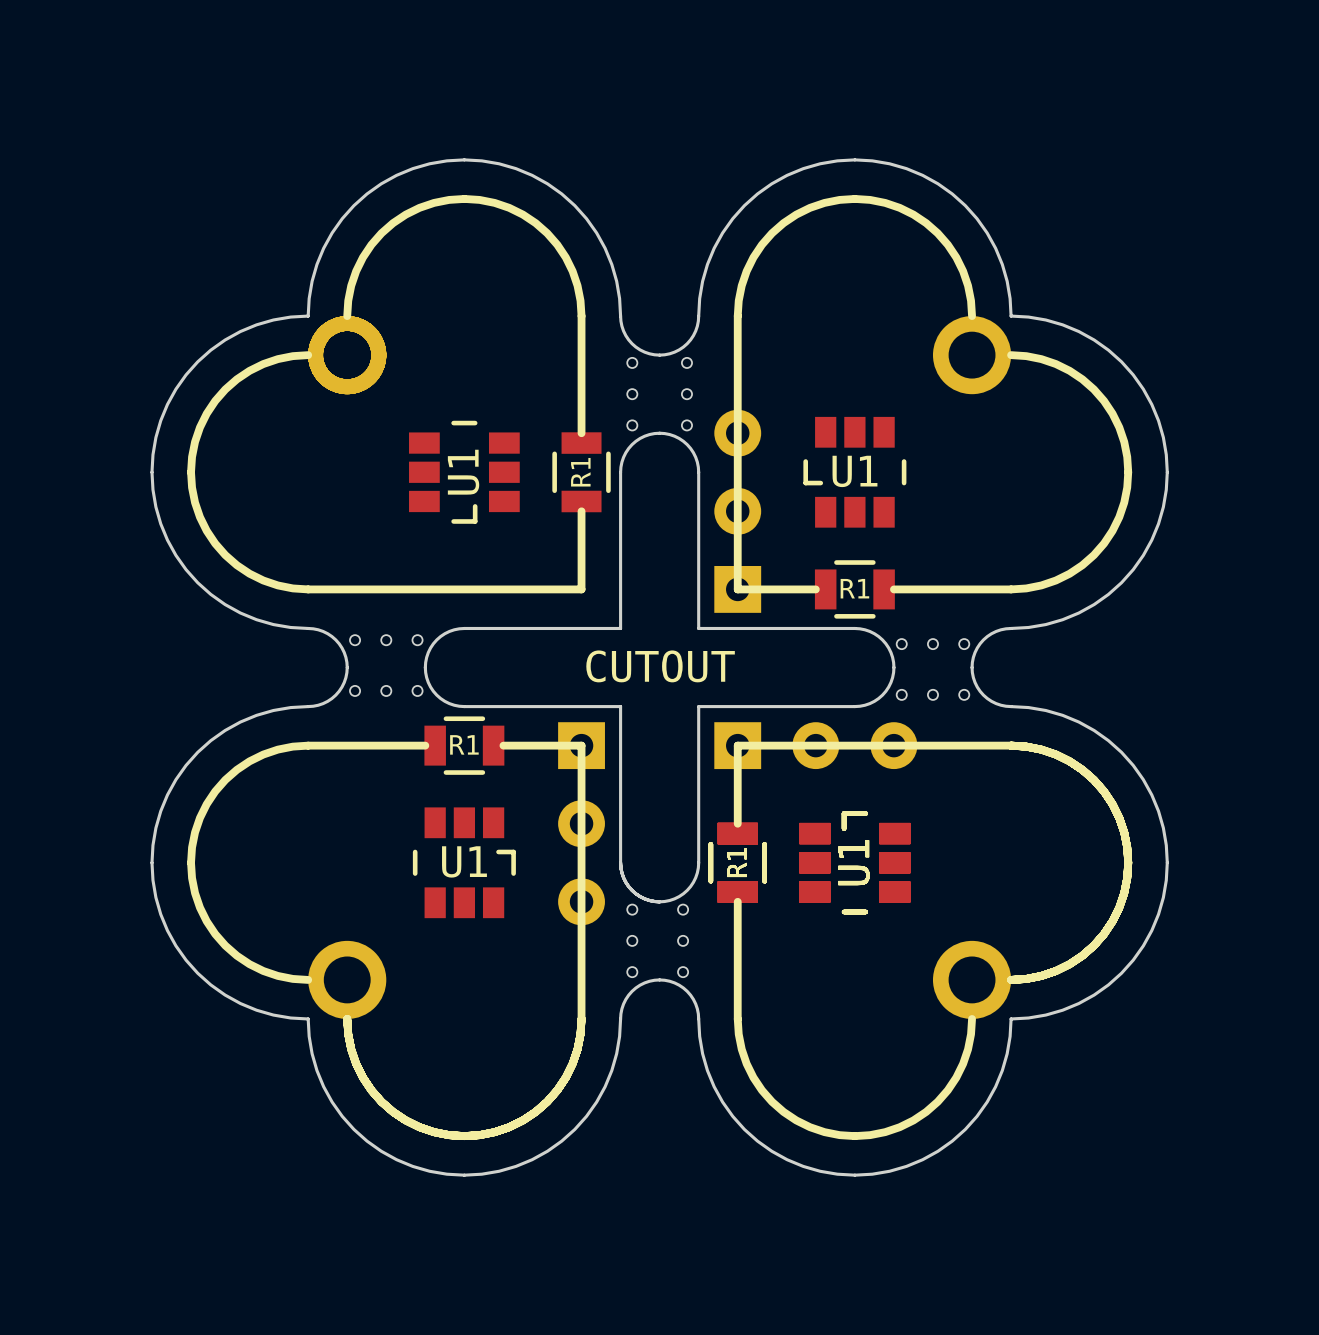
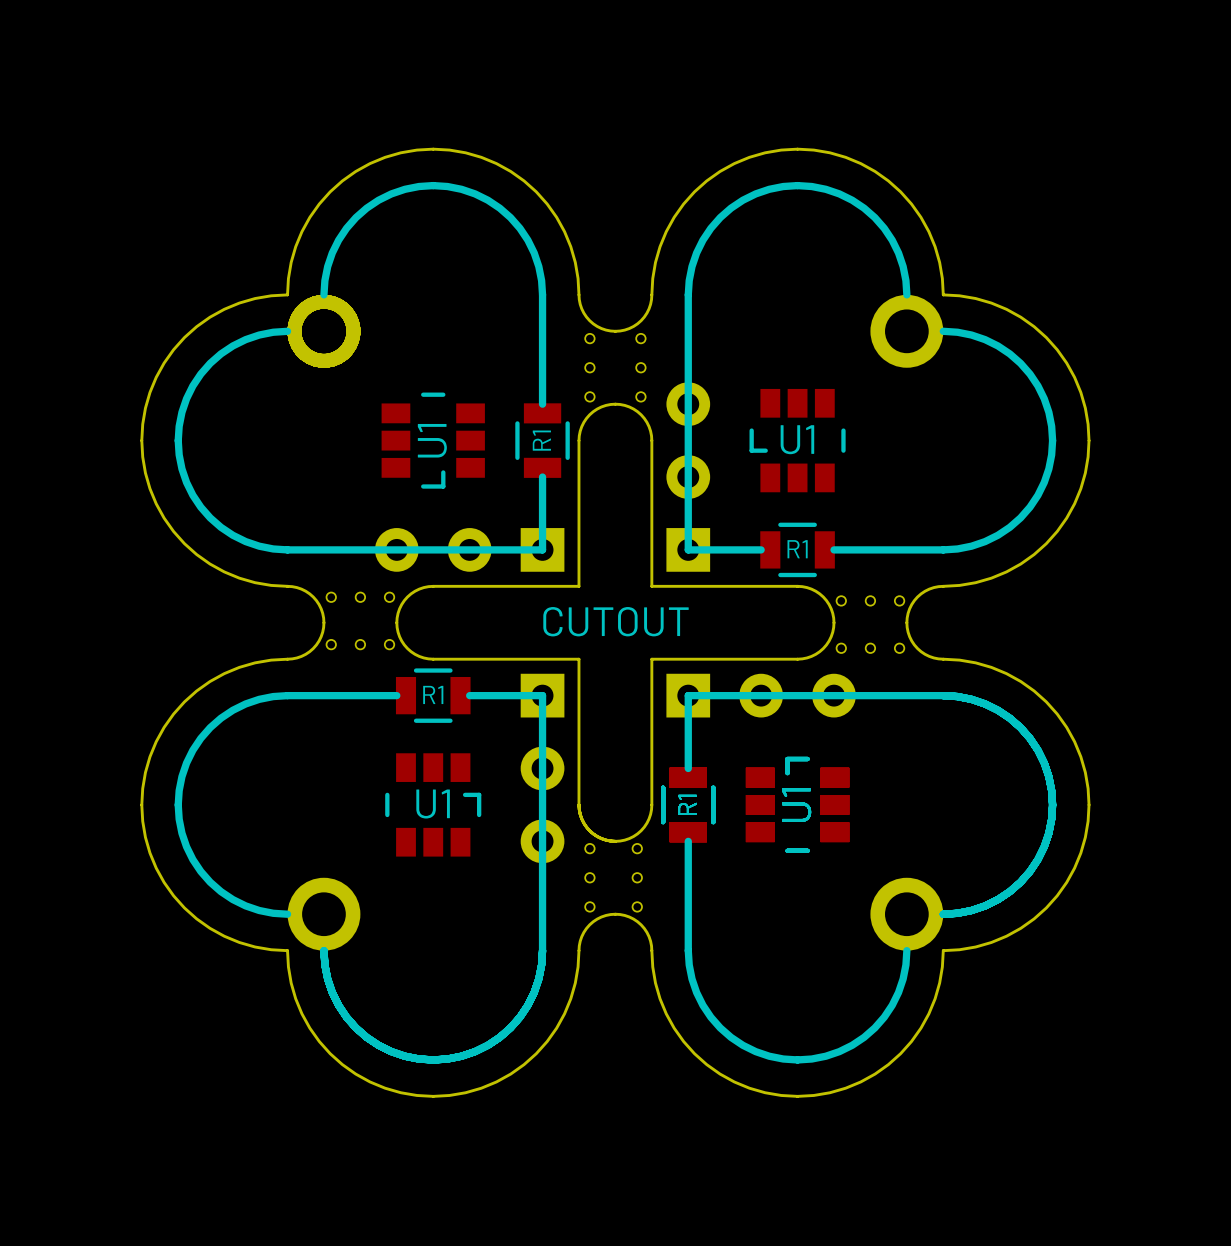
part: none -> (469, 549)

